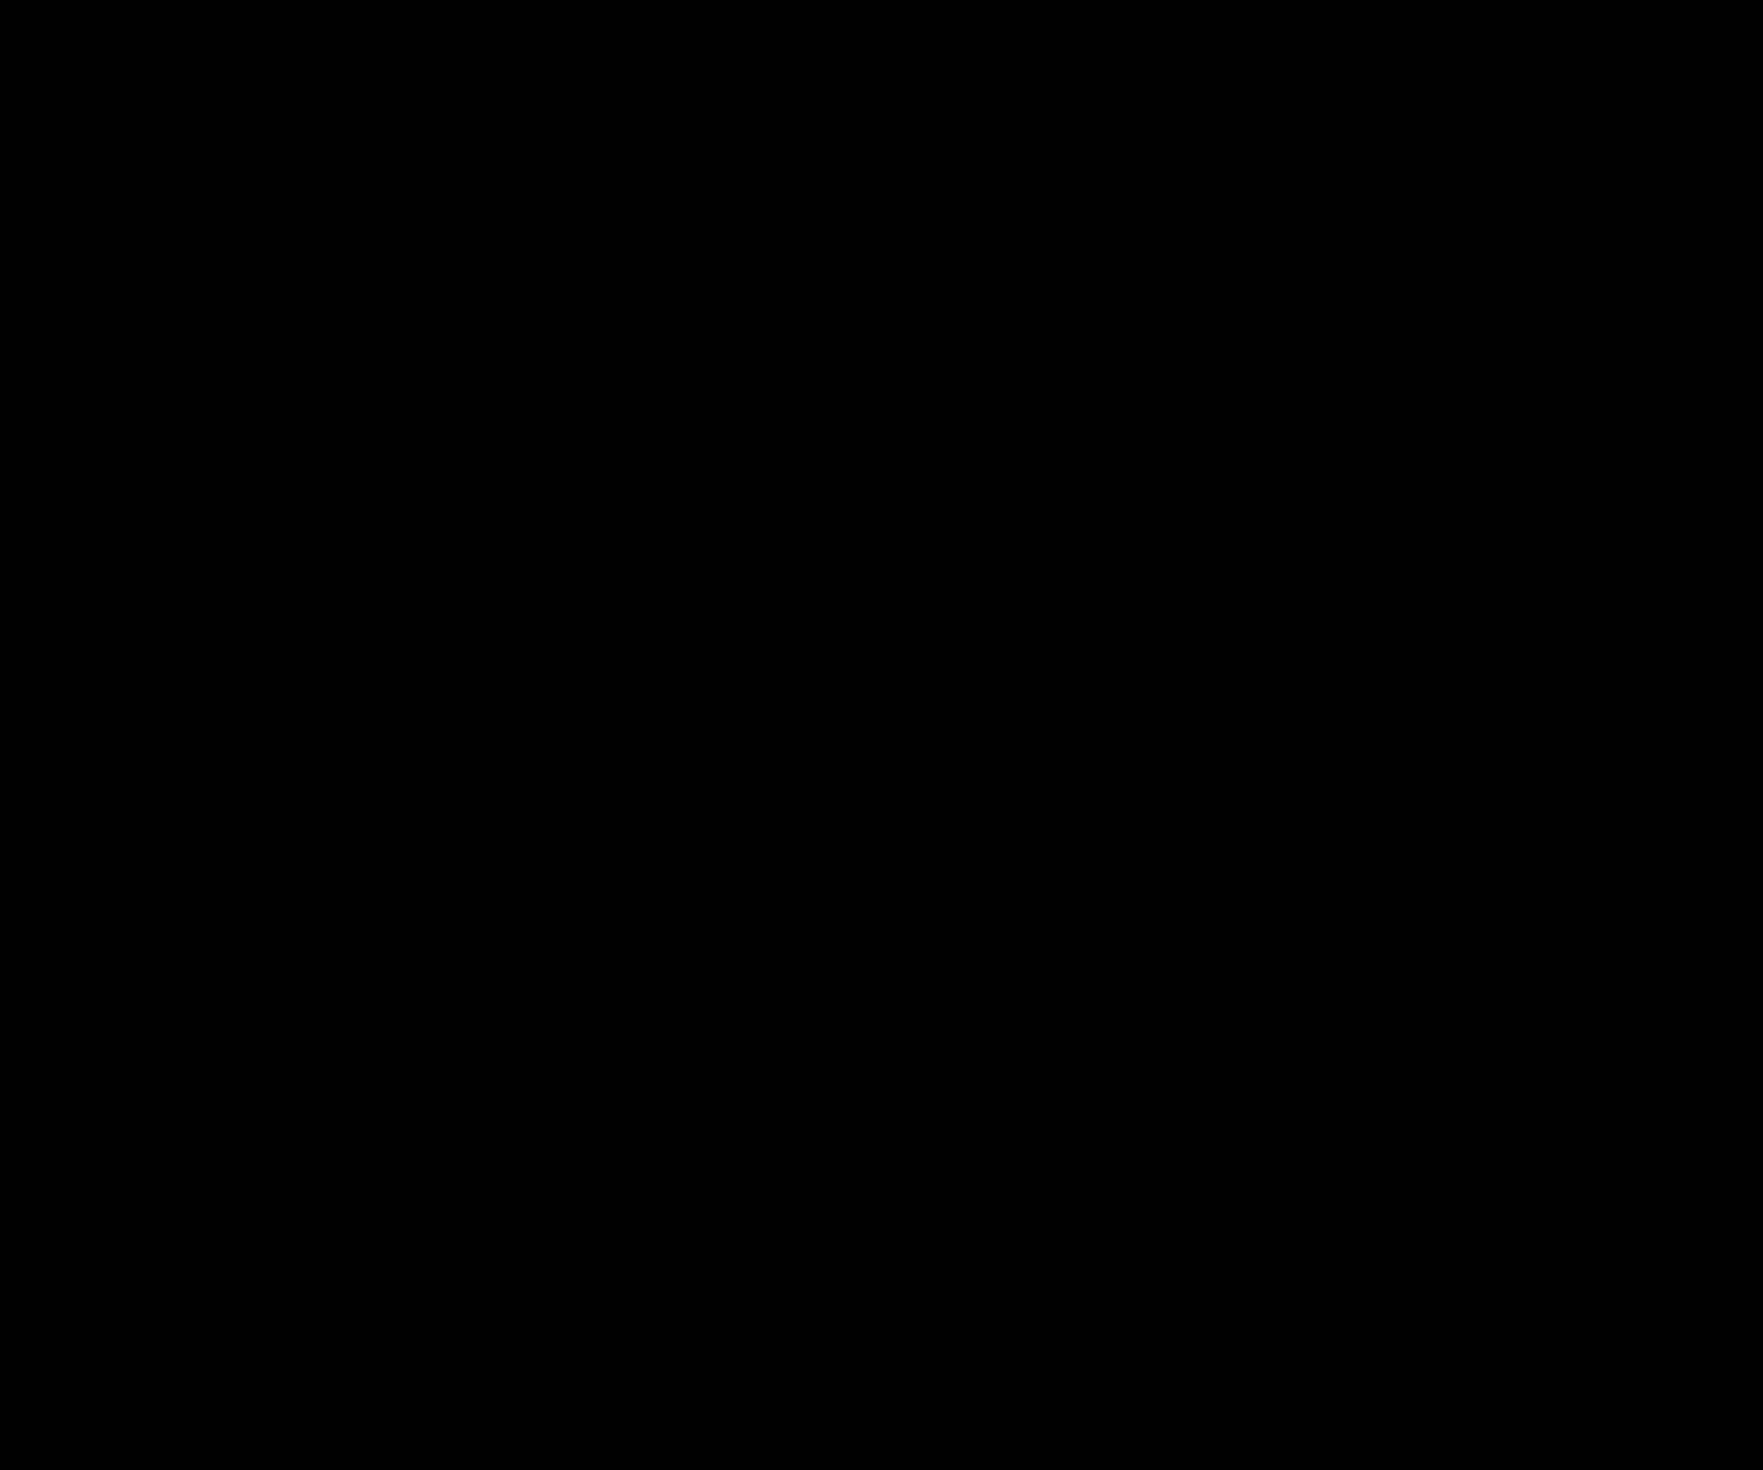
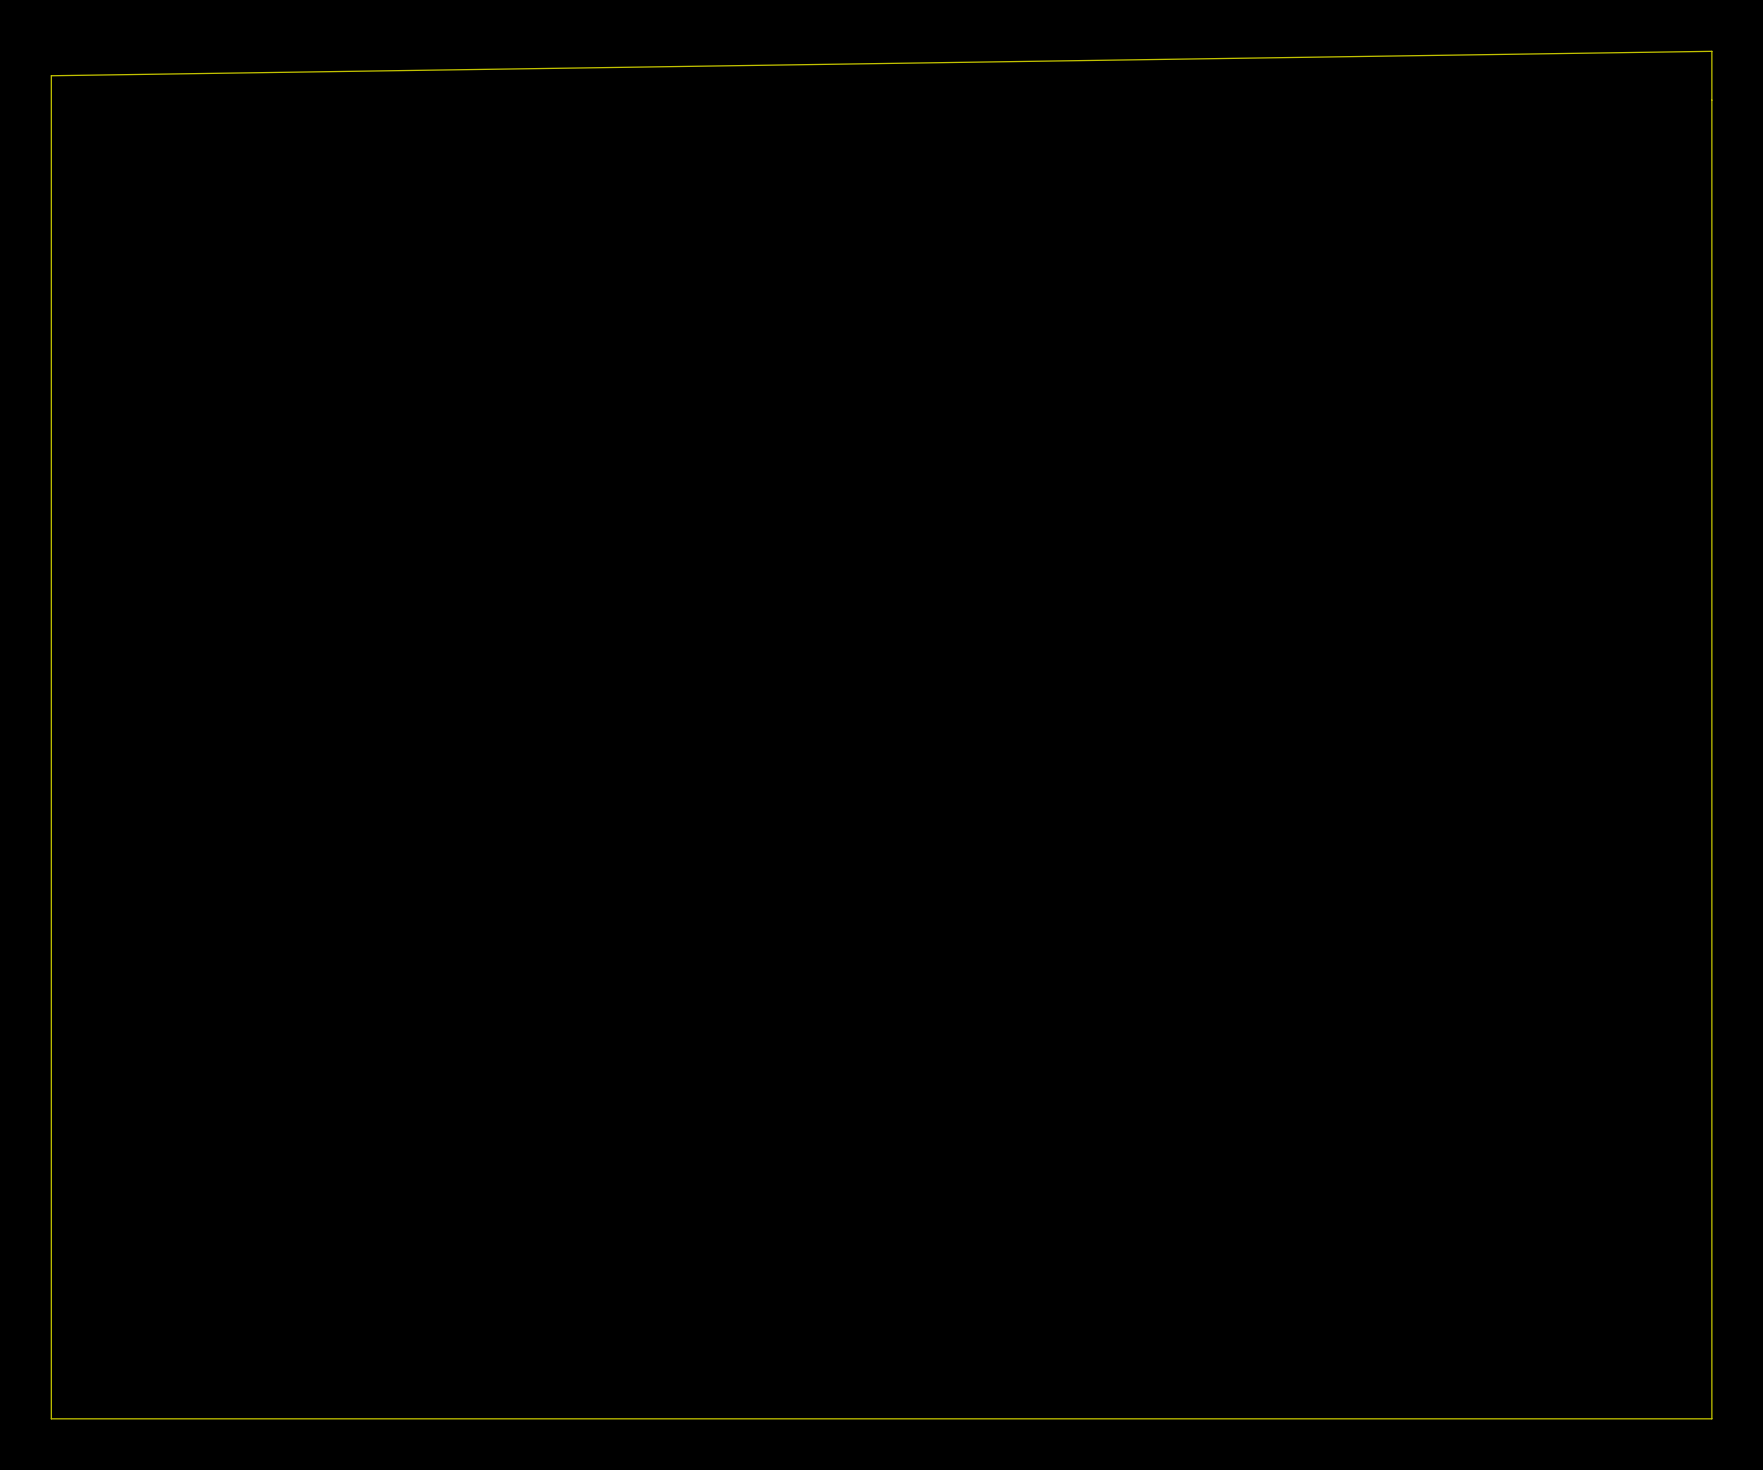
board edge: none -> (1711, 51) (1711, 1418) (51, 1418) (51, 75) (1711, 51)

